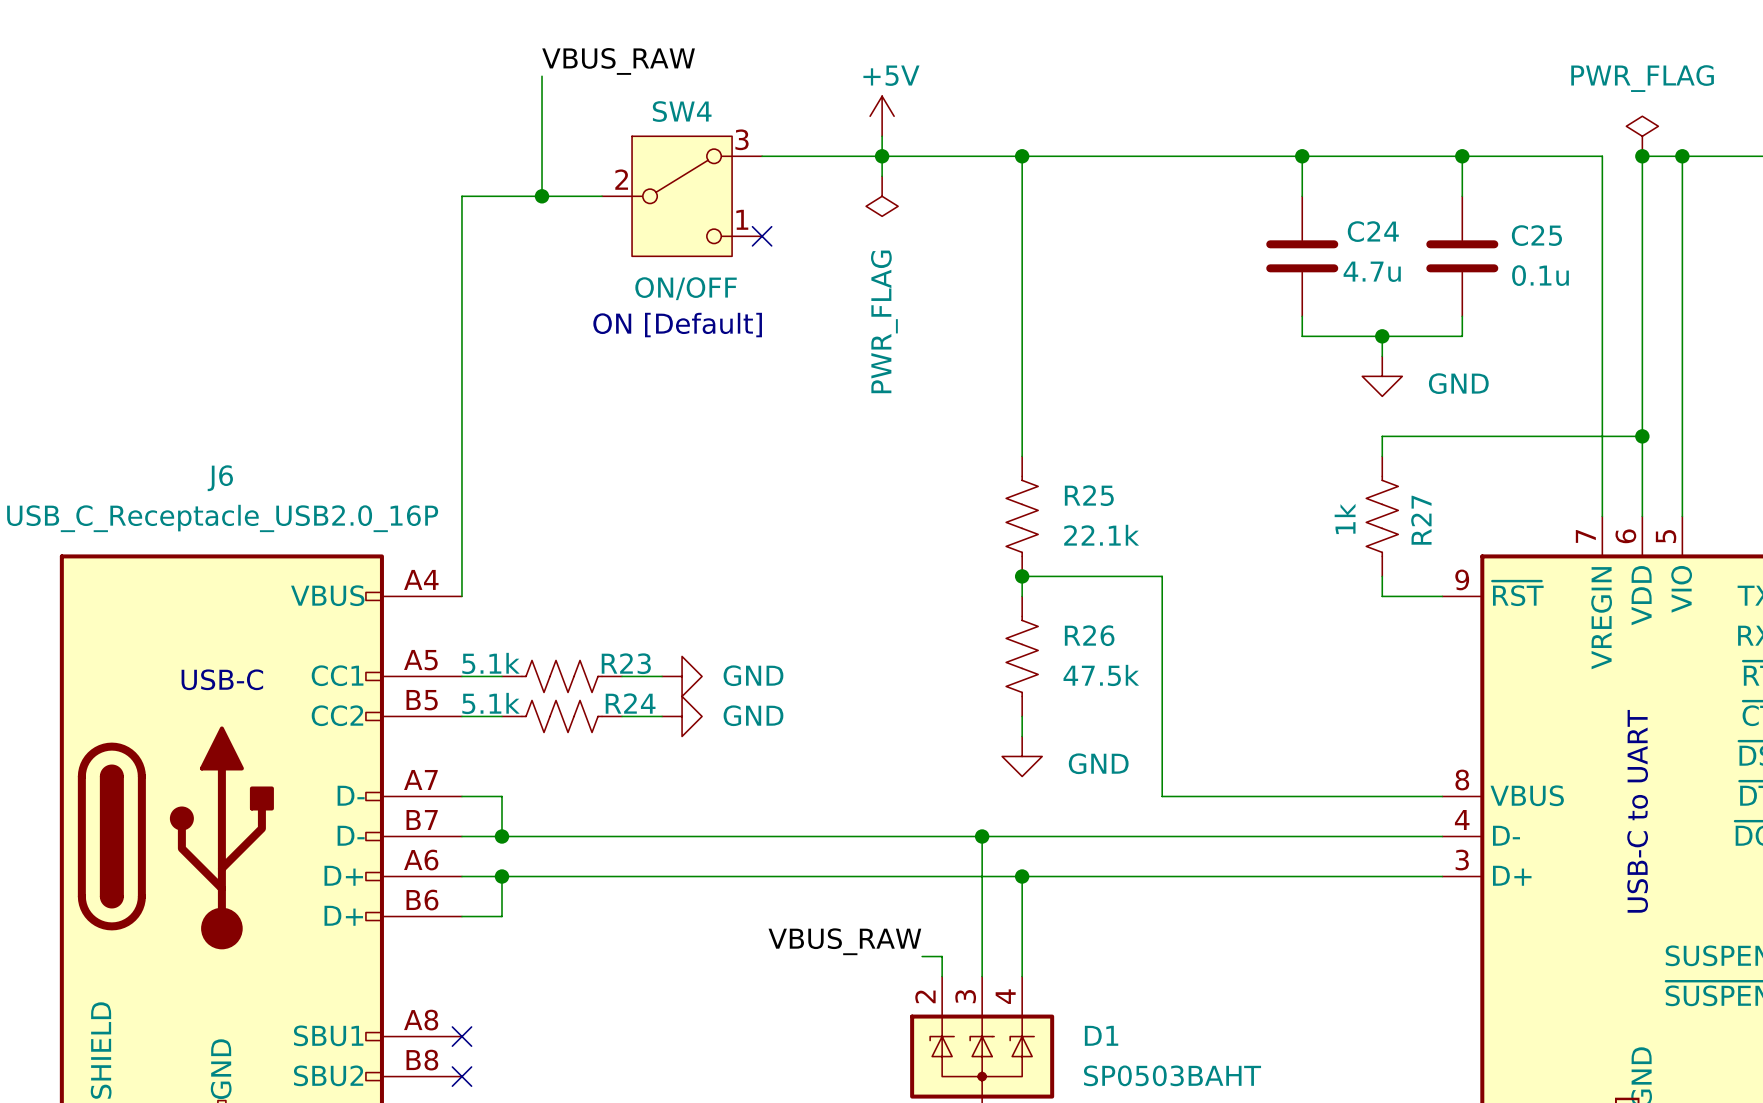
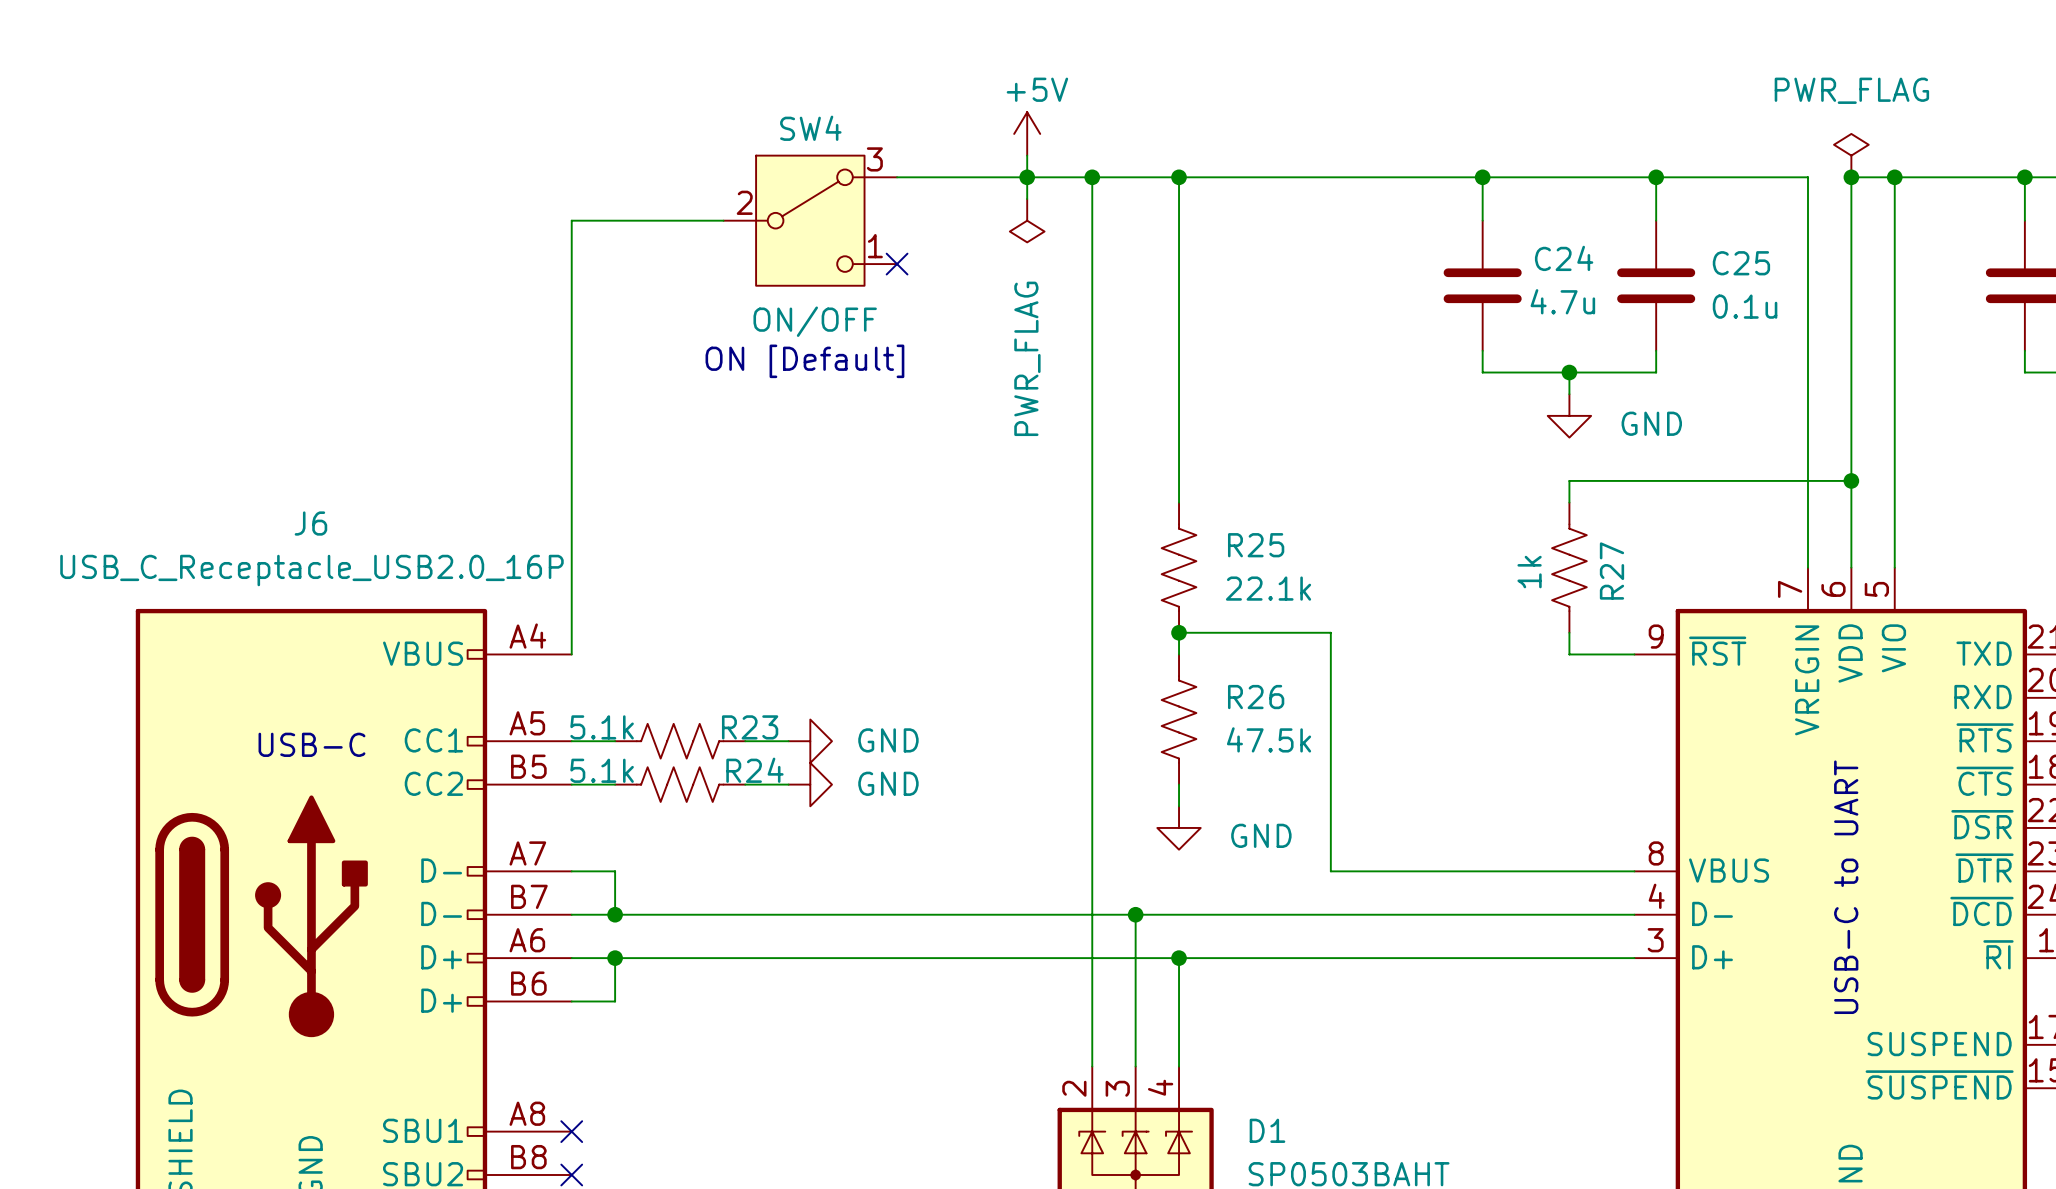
label: VBUS_RAW (618, 61) -> none
wire: (542, 76) (542, 196) -> none
junction: none -> (1092, 177)
junction: (542, 196) -> none
label: VBUS_RAW (844, 941) -> none
wire: (922, 956) (942, 956) -> (1092, 177) (1092, 1044)

